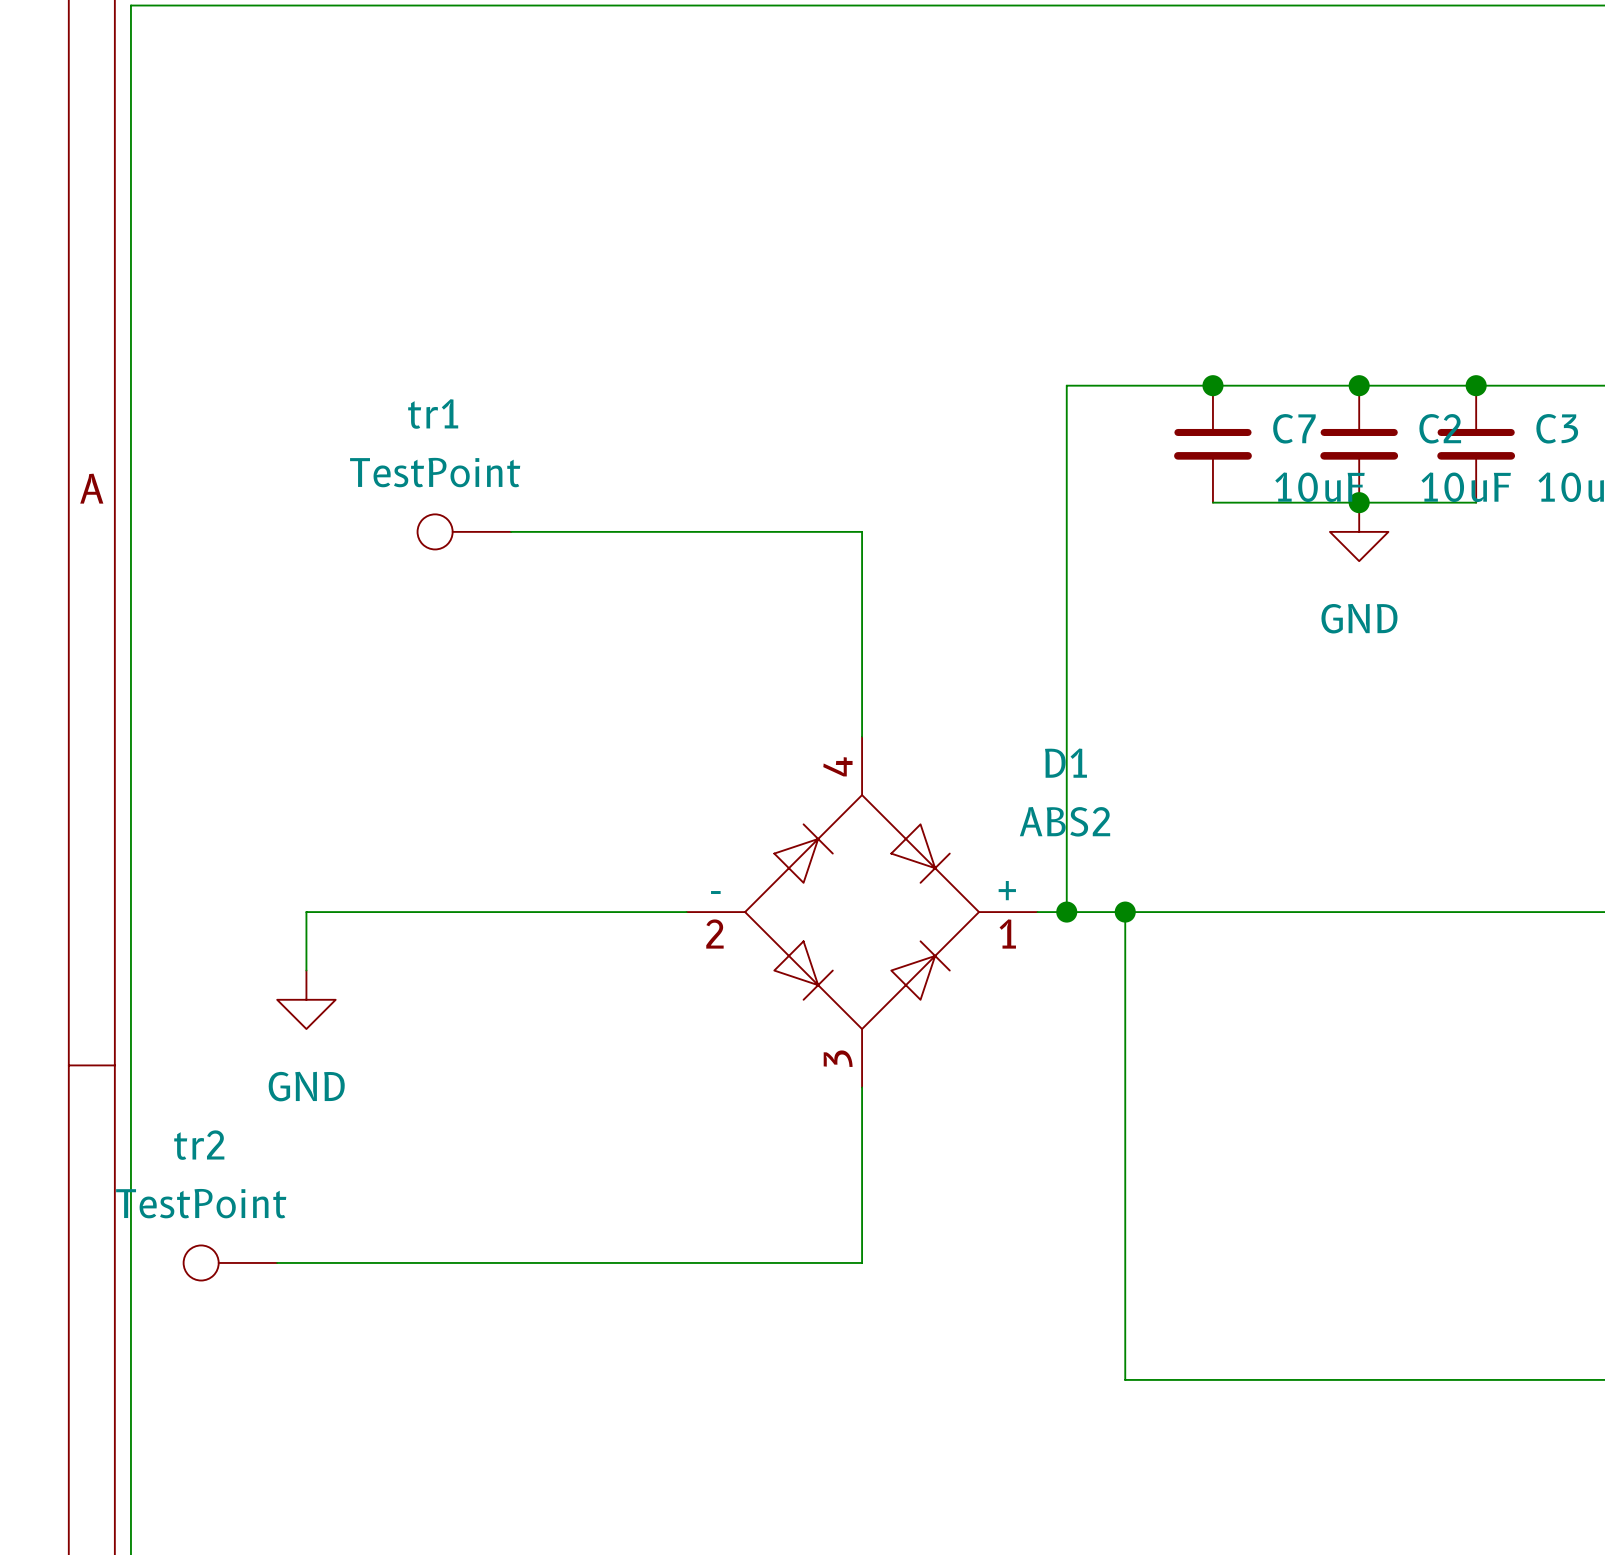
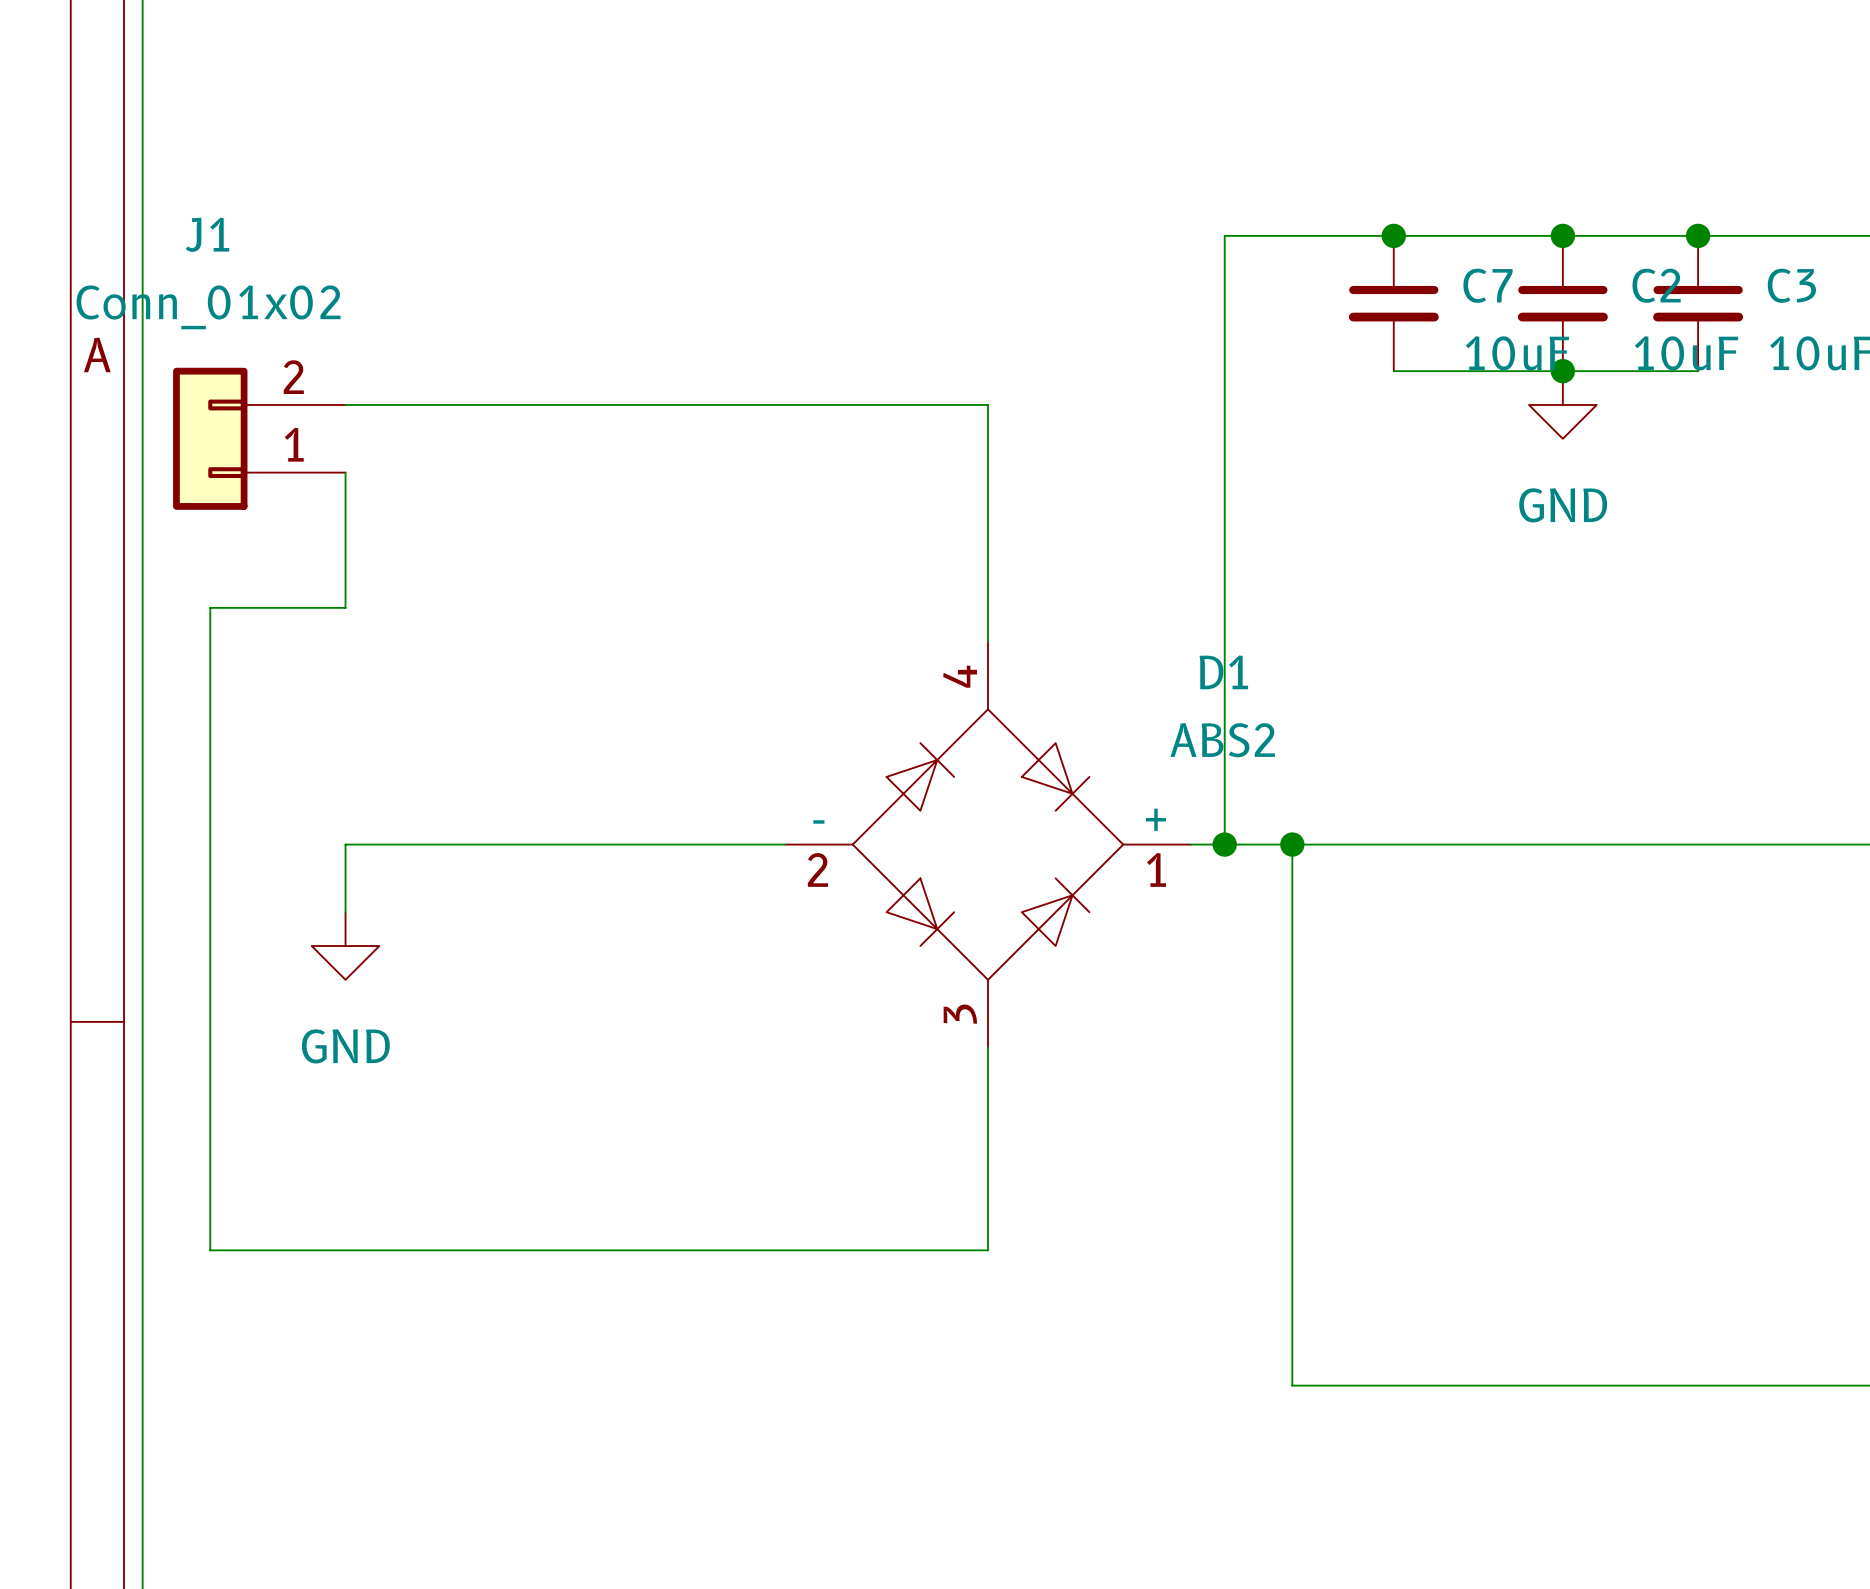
wire: none -> (345, 404) (582, 404)
tr1: TestPoint (464, 531) -> none
J1: none -> Conn_01x02 (259, 438)
wire: none -> (345, 472) (345, 607) (210, 607) (210, 1250) (311, 1250)
tr2: TestPoint (230, 1262) -> none

